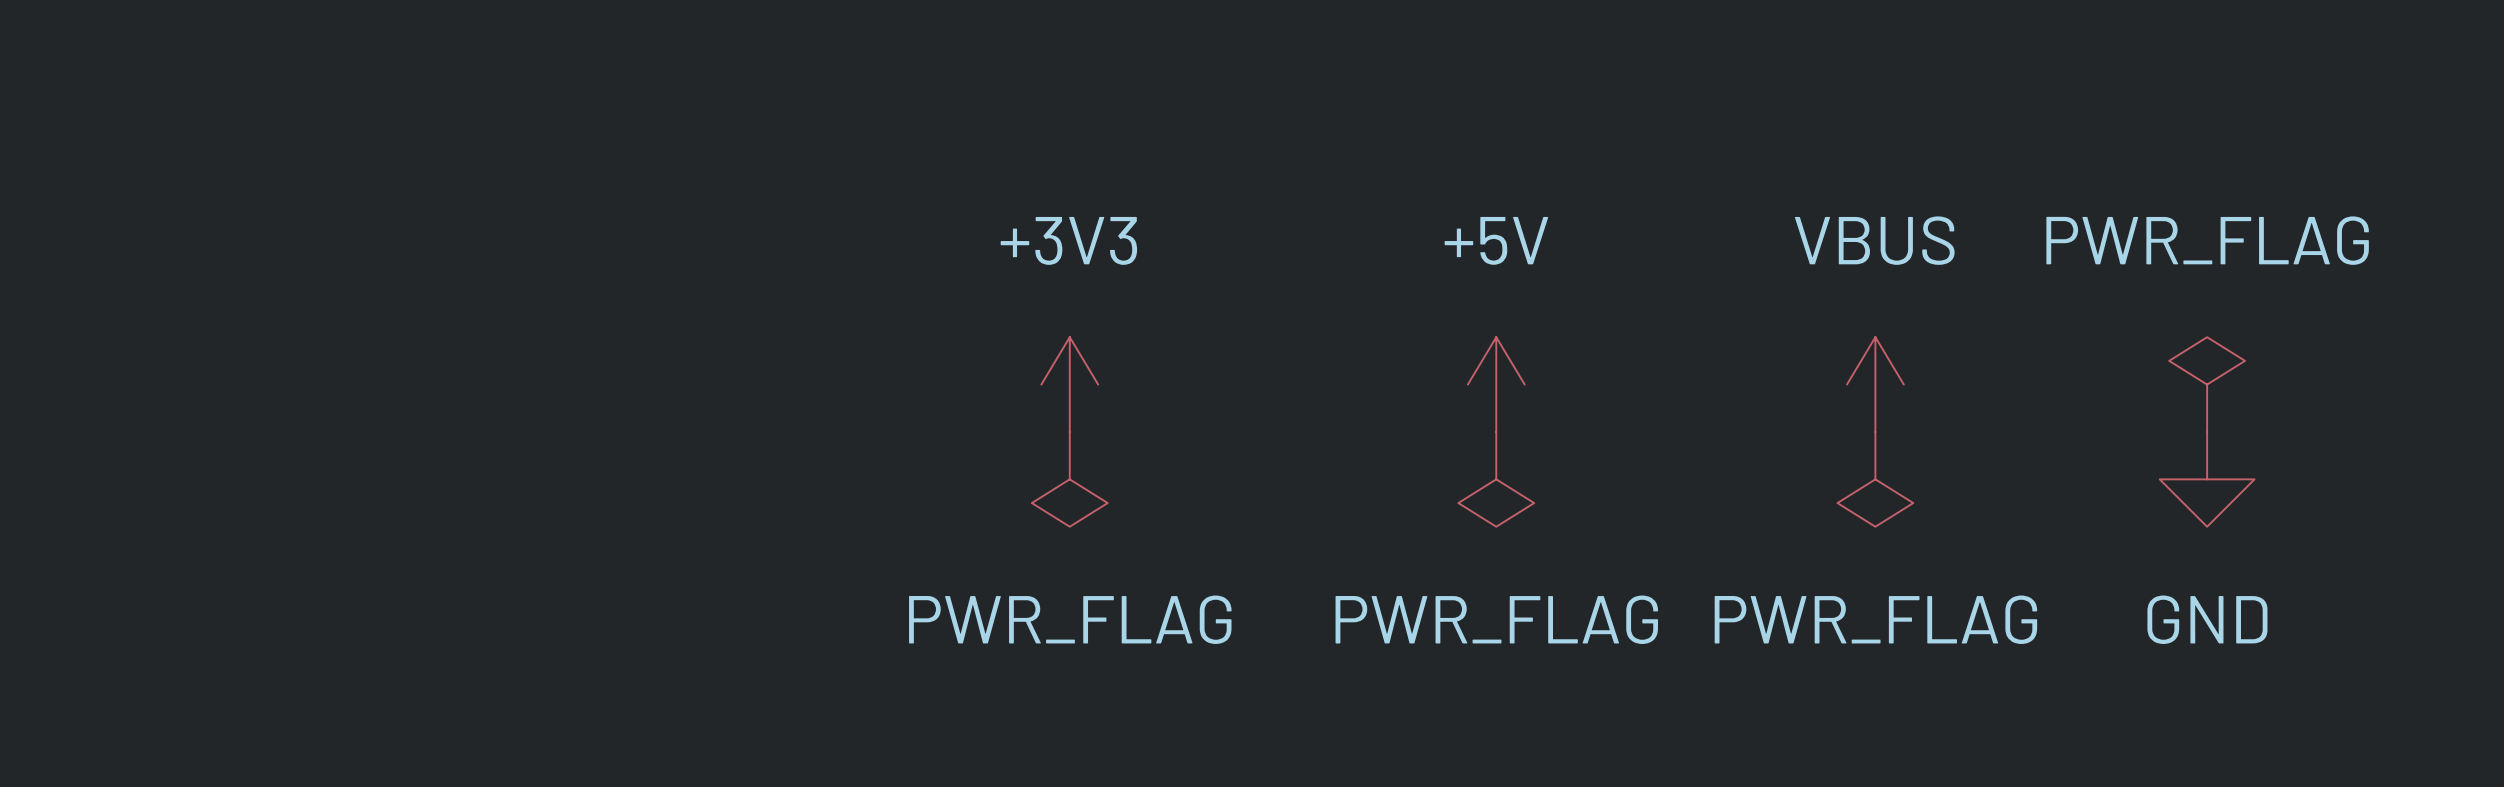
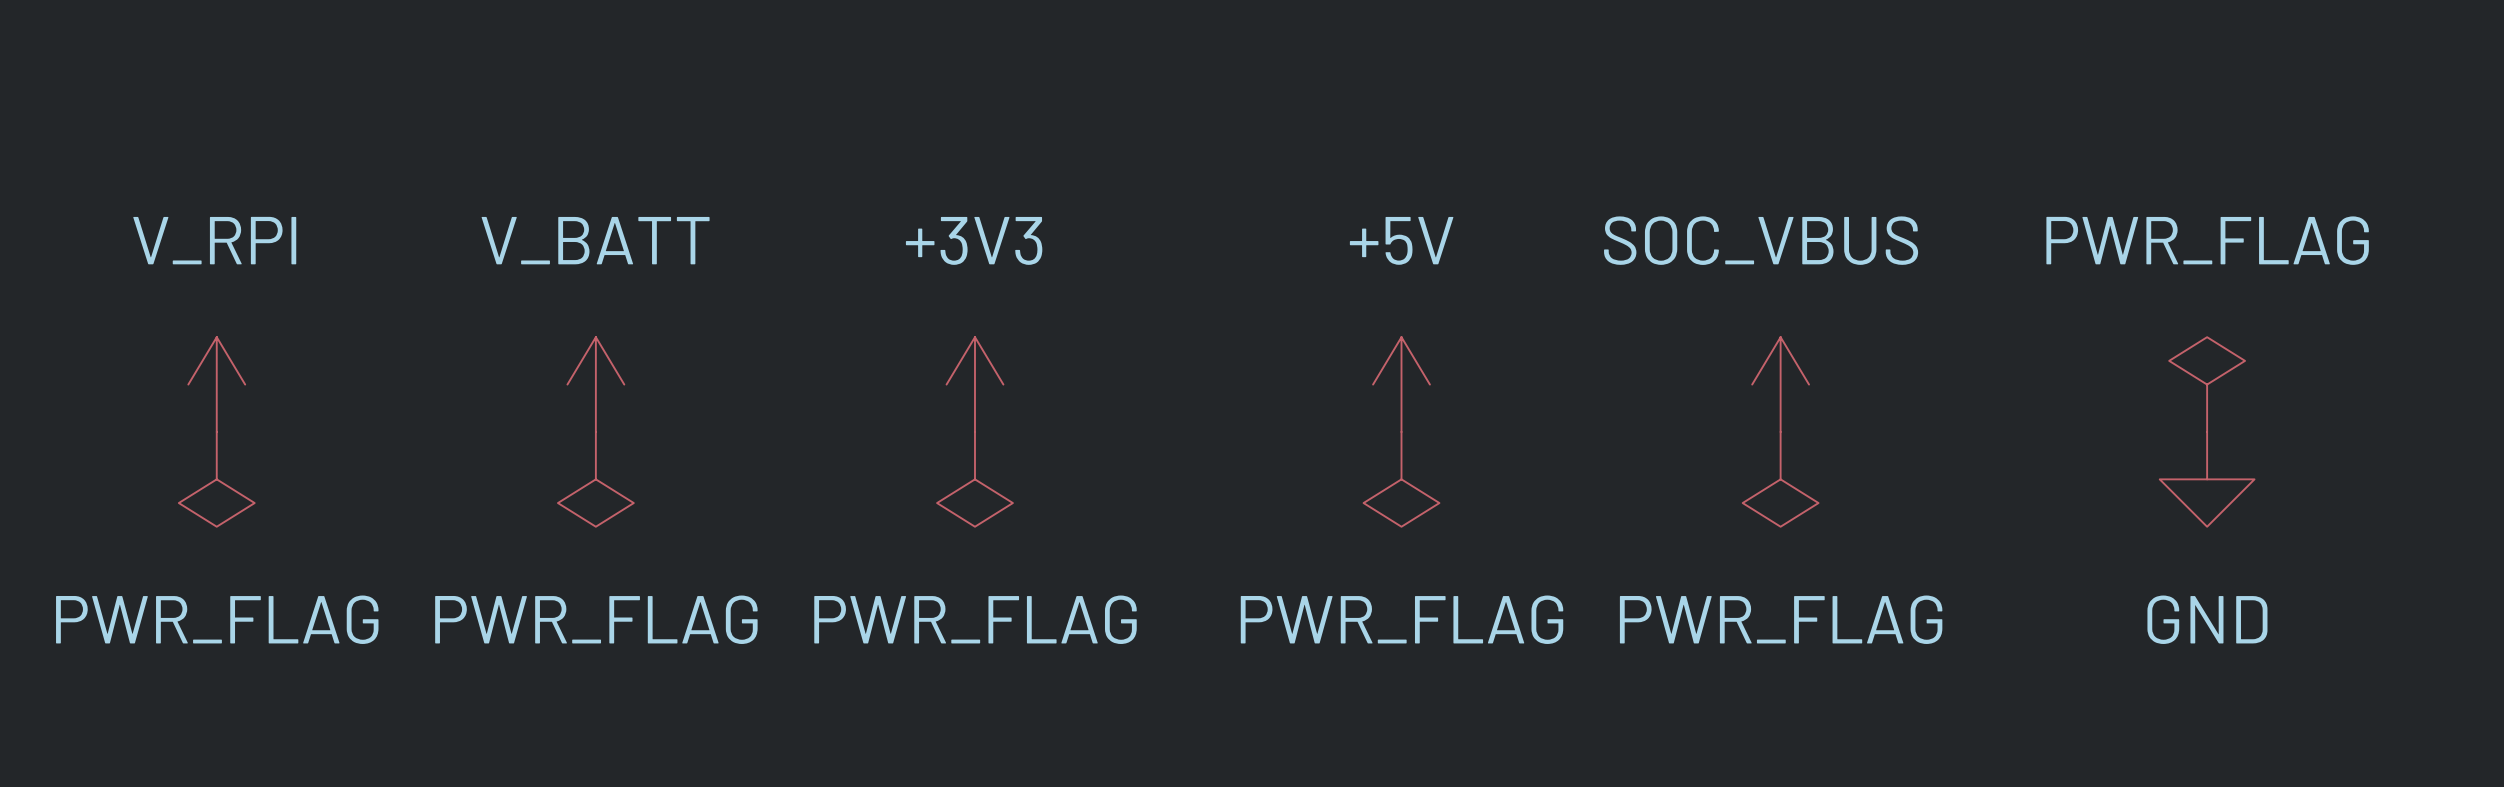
power symbol: none -> V_RPI (216, 384)
power symbol: none -> V_BATT (595, 384)
power symbol position: +3V3 (1069, 384) -> +3V3 (974, 384)
power symbol position: +5V (1496, 384) -> +5V (1401, 384)
power symbol: none -> SOC_VBUS (1780, 384)
power symbol: VBUS (1875, 384) -> none
power symbol: none -> PWR_FLAG (216, 479)
power symbol: none -> PWR_FLAG (595, 479)
power symbol position: PWR_FLAG (1069, 479) -> PWR_FLAG (974, 479)
power symbol position: PWR_FLAG (1496, 479) -> PWR_FLAG (1401, 479)
power symbol position: PWR_FLAG (1875, 479) -> PWR_FLAG (1780, 479)

